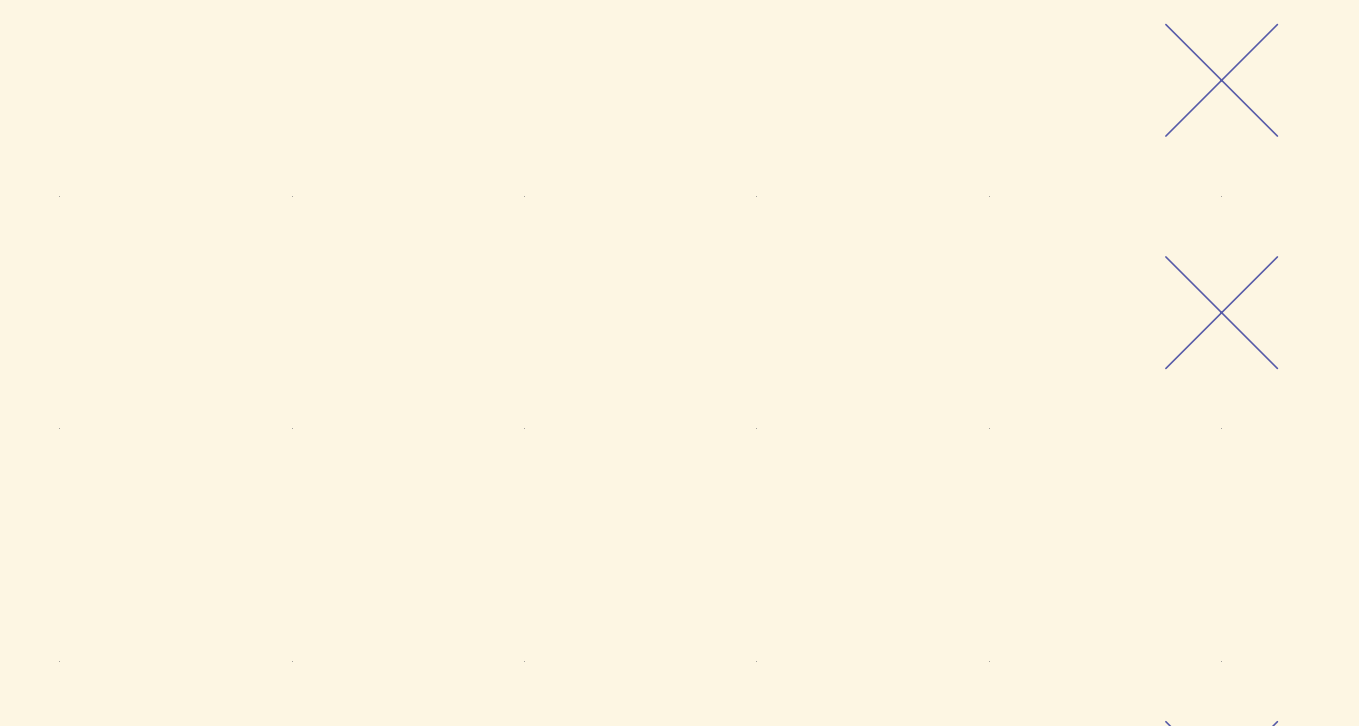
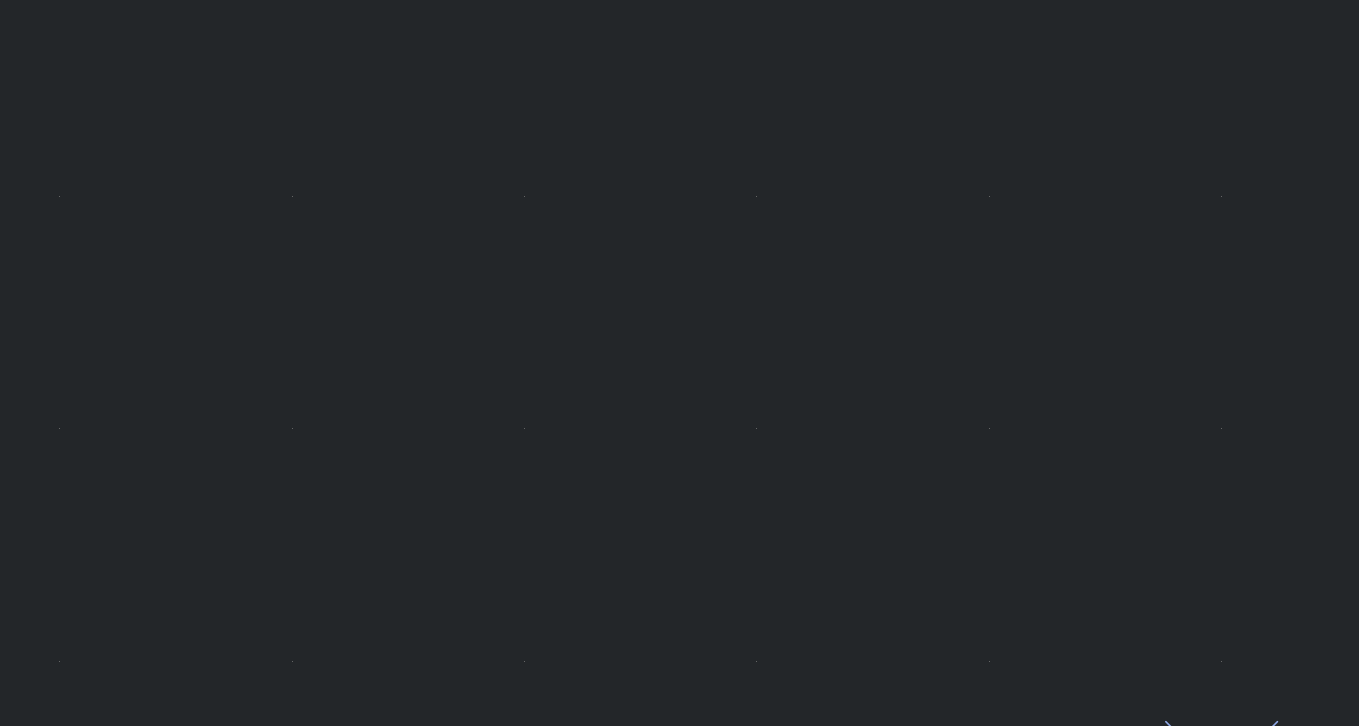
no-connect mark: (1221, 80) -> none
no-connect mark: (1221, 312) -> none

